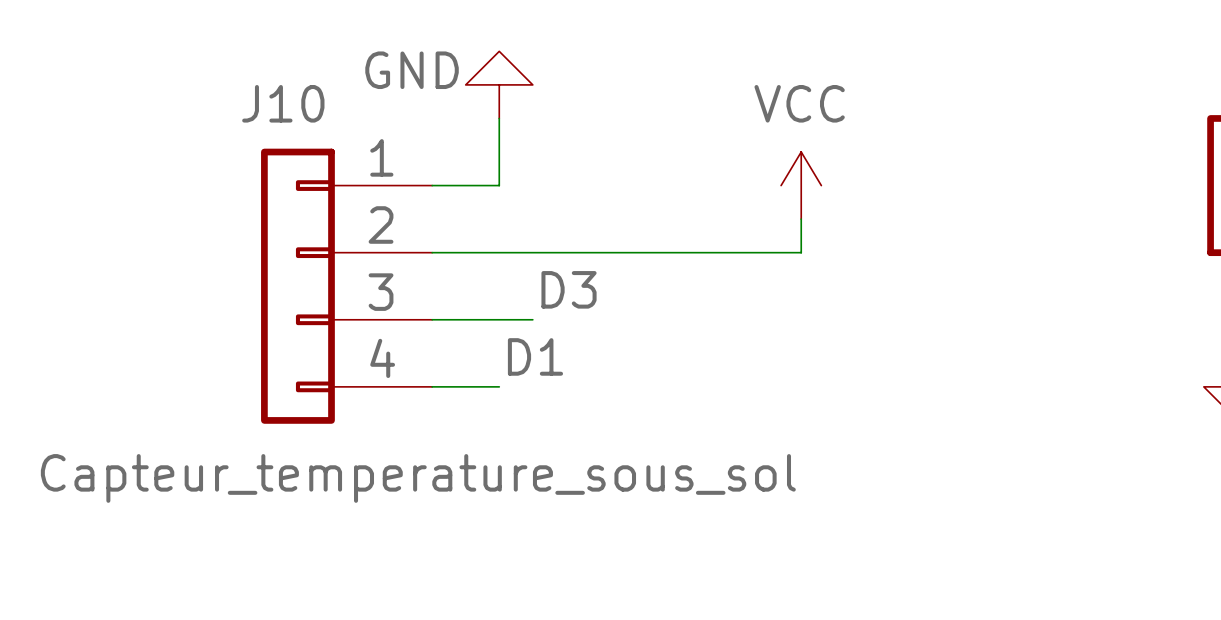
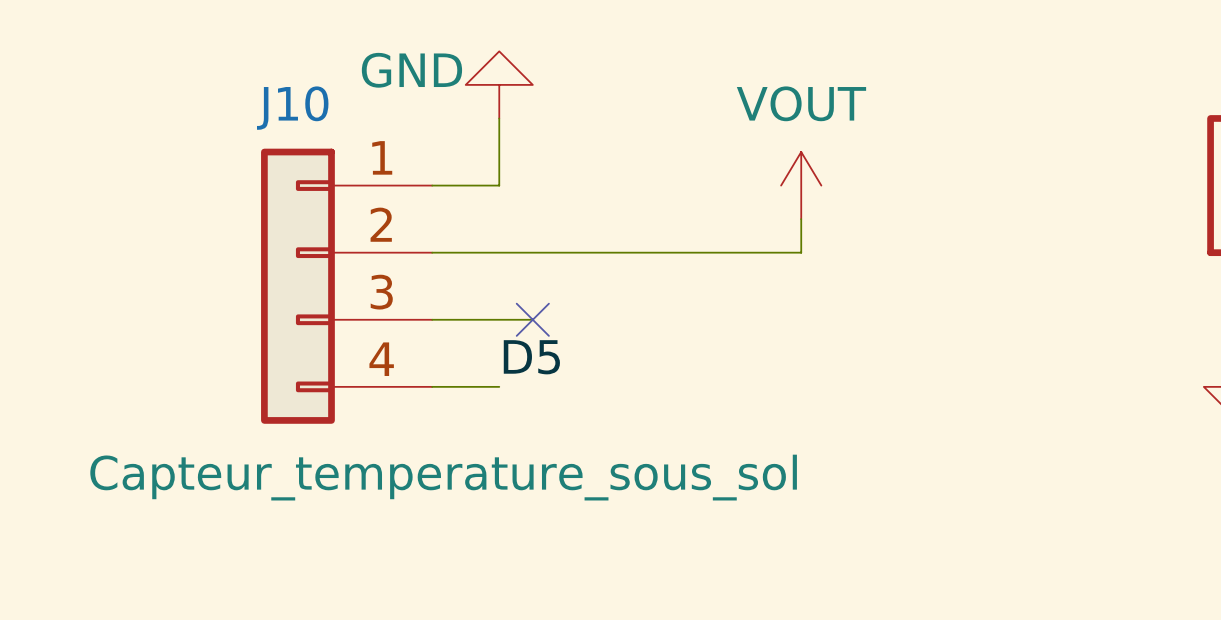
power symbol: VCC (801, 185) -> VOUT (801, 185)
label: D3 (569, 289) -> none
no-connect mark: none -> (532, 319)
label: D1 (535, 356) -> D5 (531, 357)

